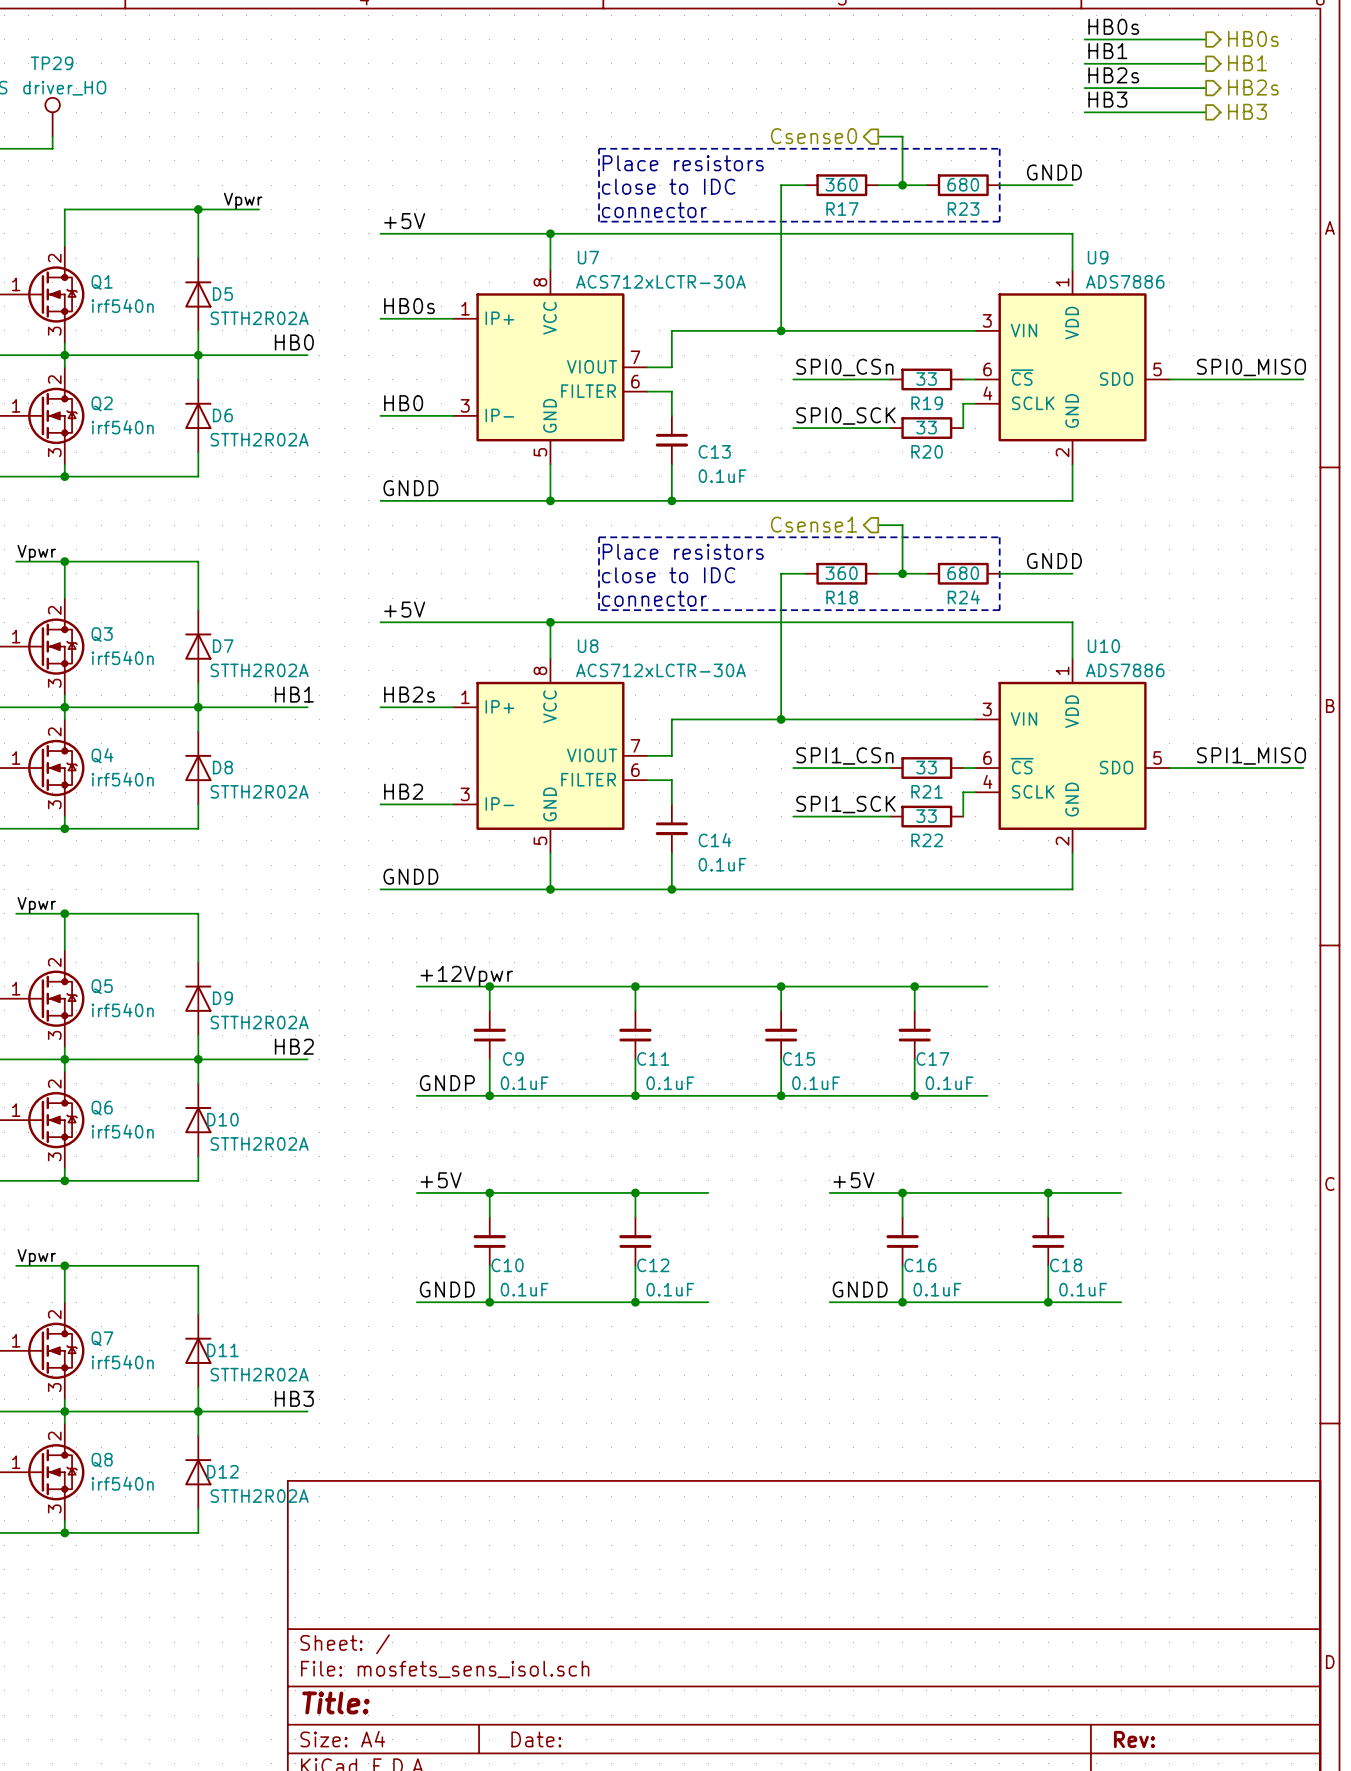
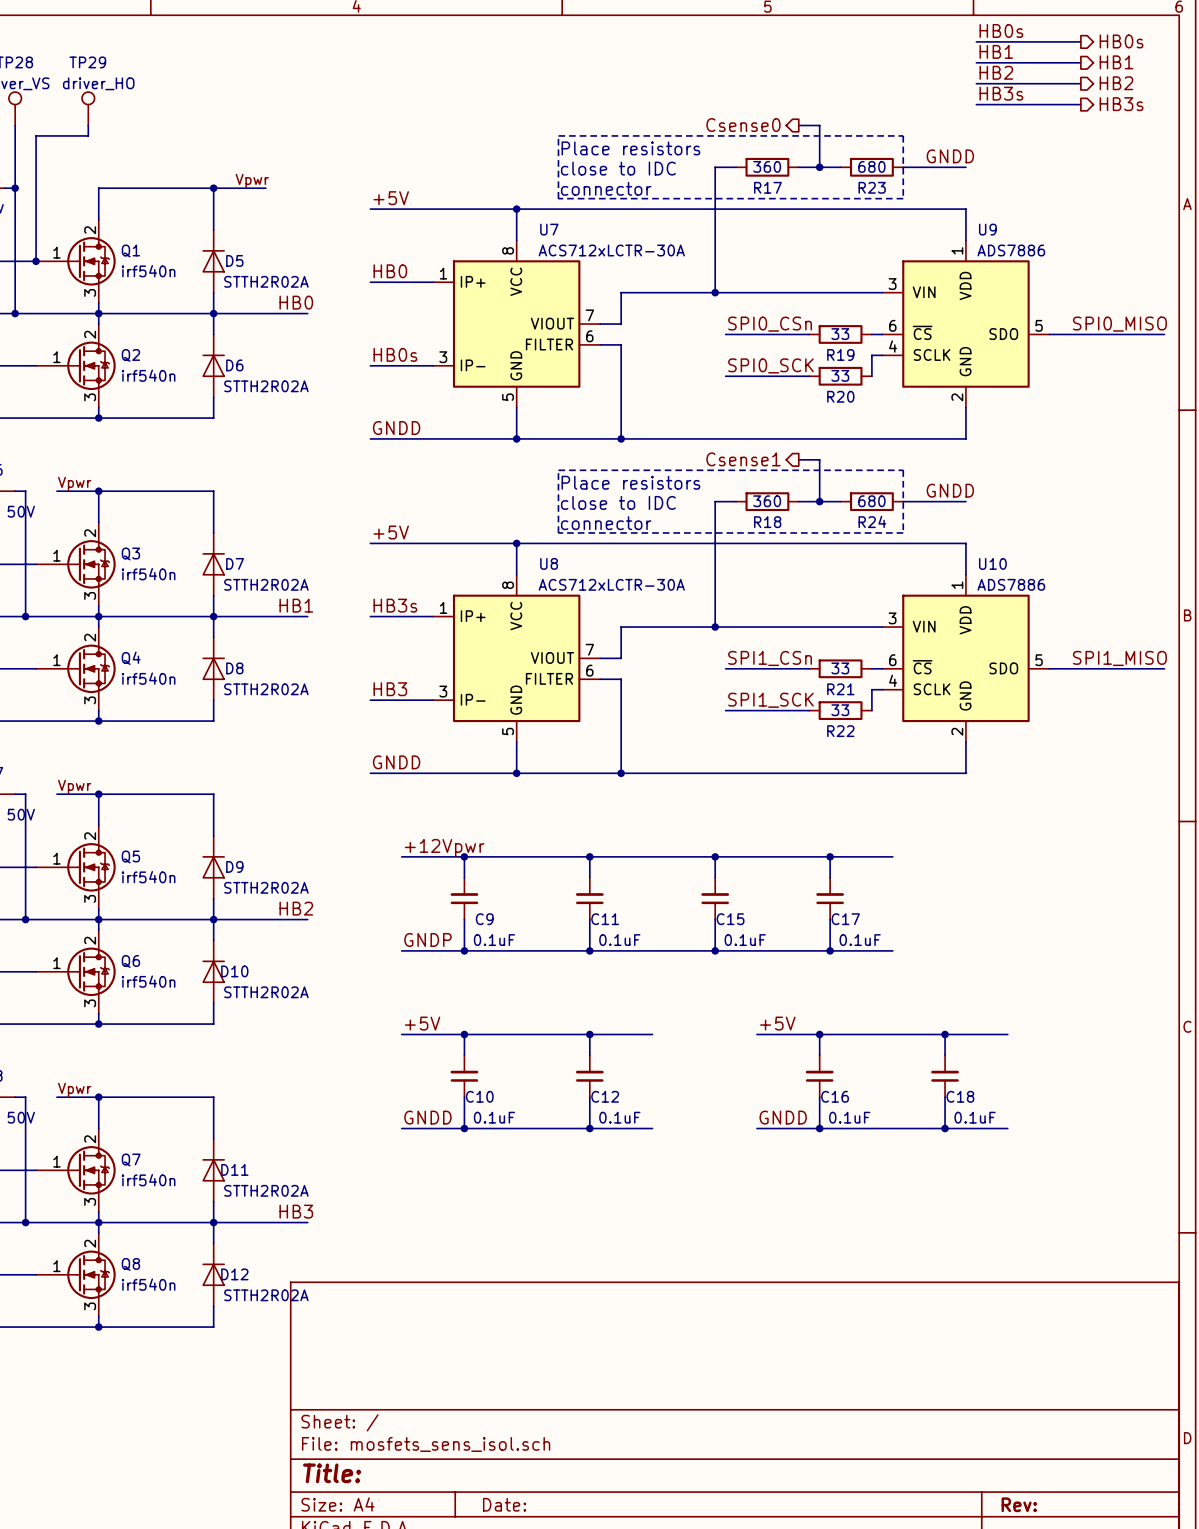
label: HB2s (1113, 75) -> HB2 (996, 72)
hierarchical label: HB2s (1253, 87) -> HB2 (1116, 83)
label: HB3 (1107, 99) -> HB3s (1001, 93)
hierarchical label: HB3 (1247, 111) -> HB3s (1121, 104)
label: HB0s (409, 306) -> HB0 (390, 271)
label: HB0 (403, 403) -> HB0s (395, 354)
C13: 0.1uF (671, 440) -> none
label: HB2s (409, 694) -> HB3s (395, 605)
label: HB2 (403, 791) -> HB3 (390, 689)
C14: 0.1uF (671, 828) -> none

